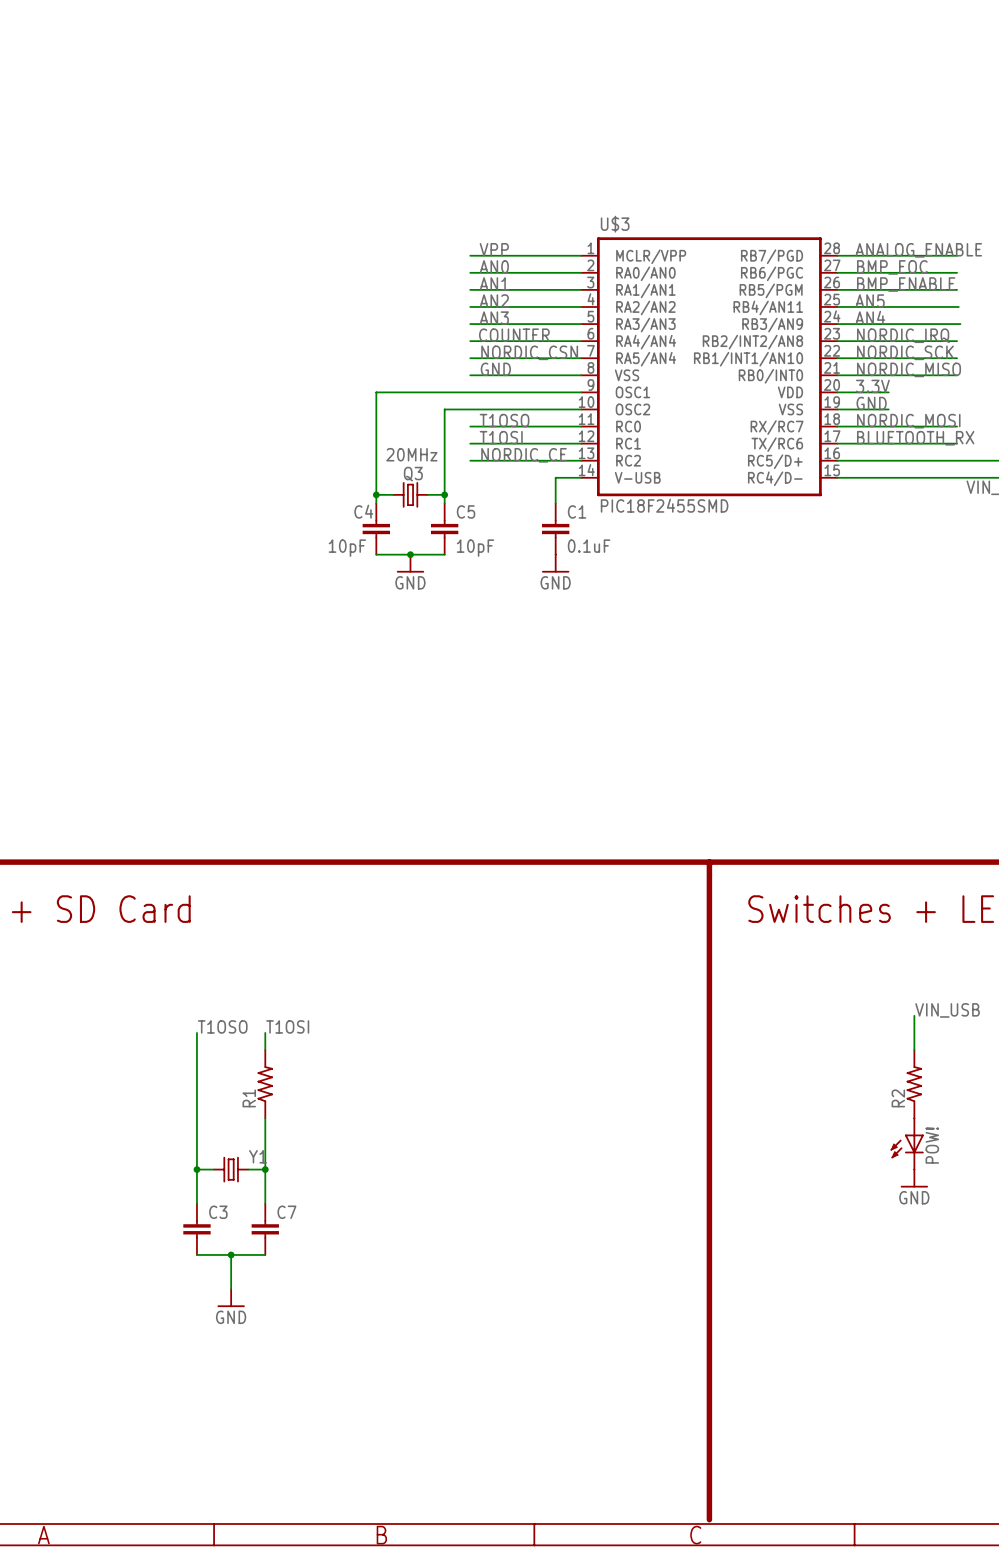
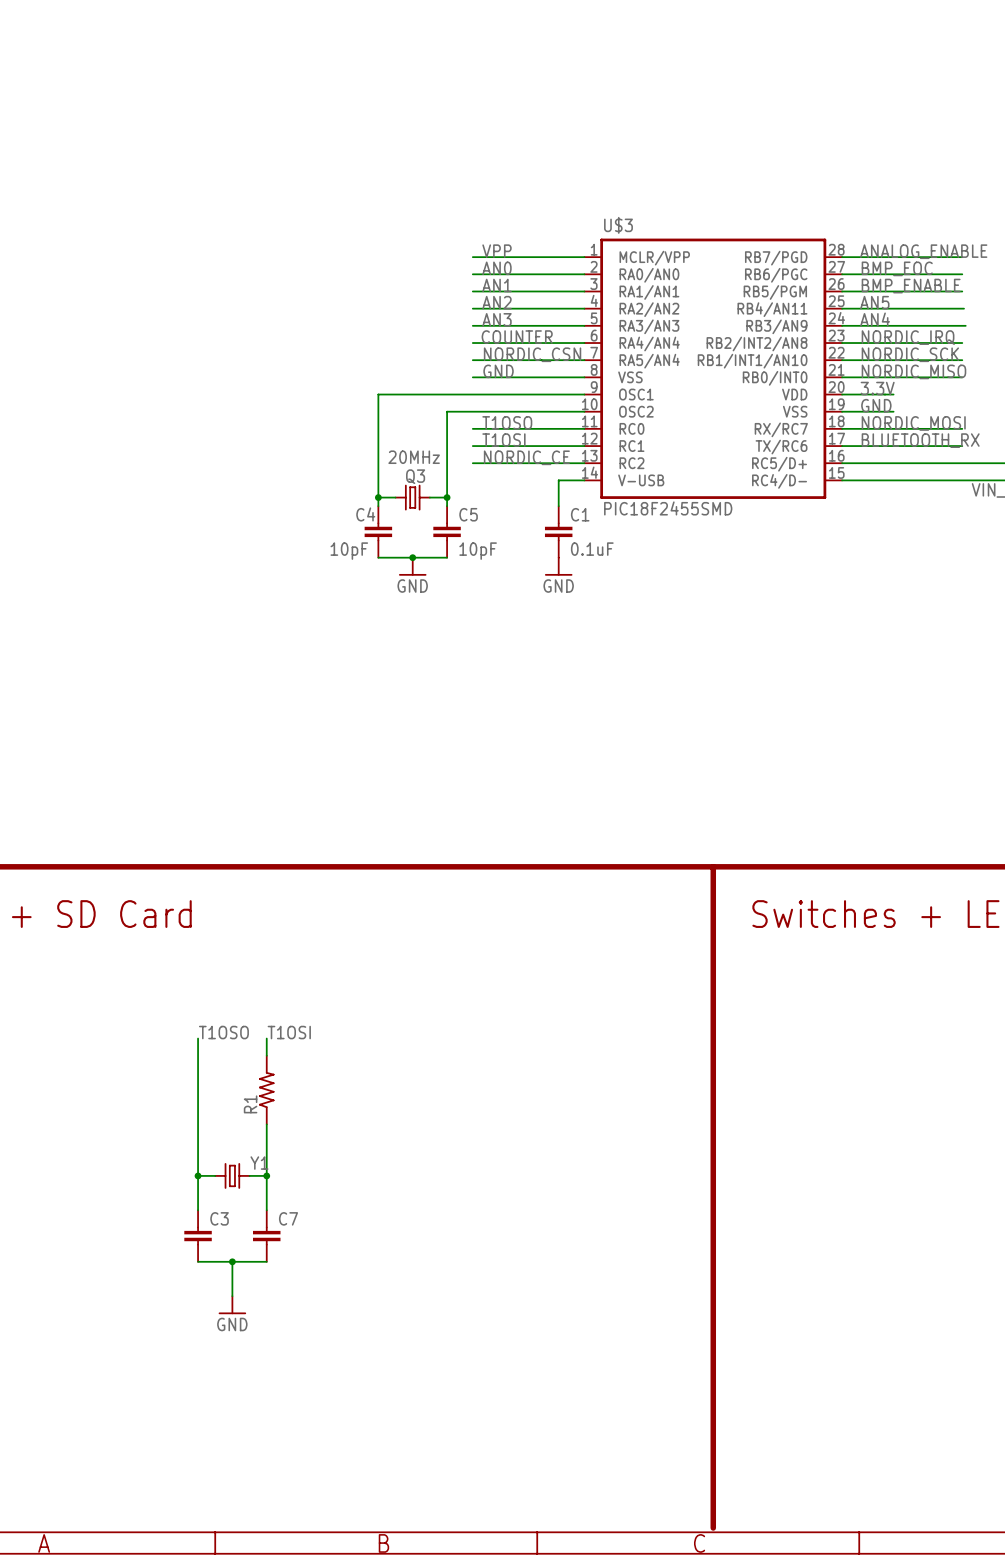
label: VIN_USB (947, 1010) -> none
wire: (914, 1015) (914, 1050) -> none
R2: (914, 1084) -> none
POW!: (907, 1143) -> none
power symbol: GND (914, 1178) -> none

